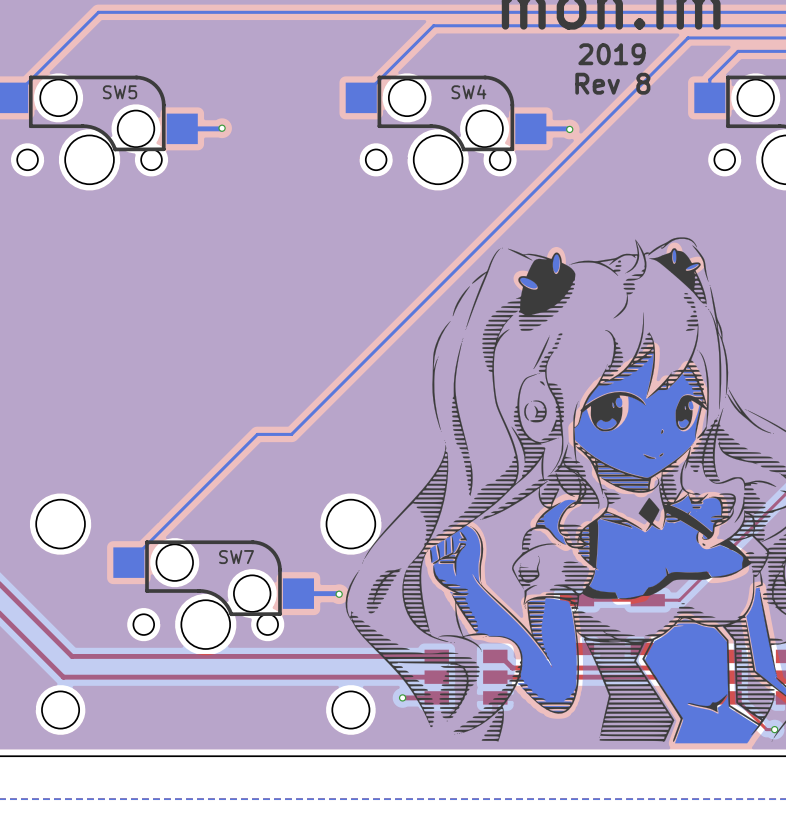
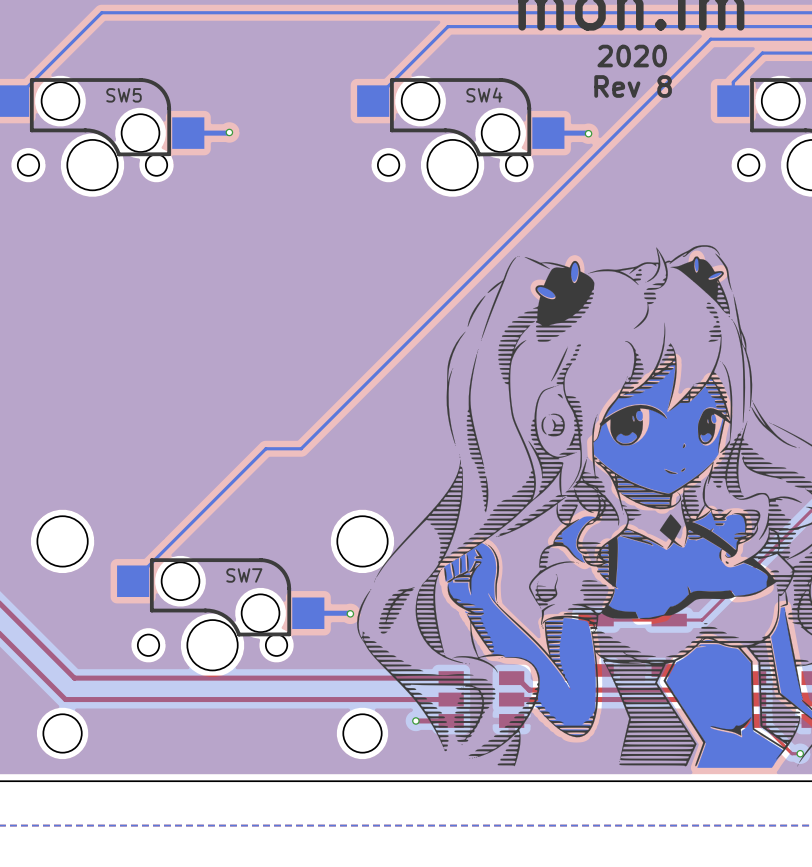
text: 2019 (611, 54) -> 2020 (632, 56)

